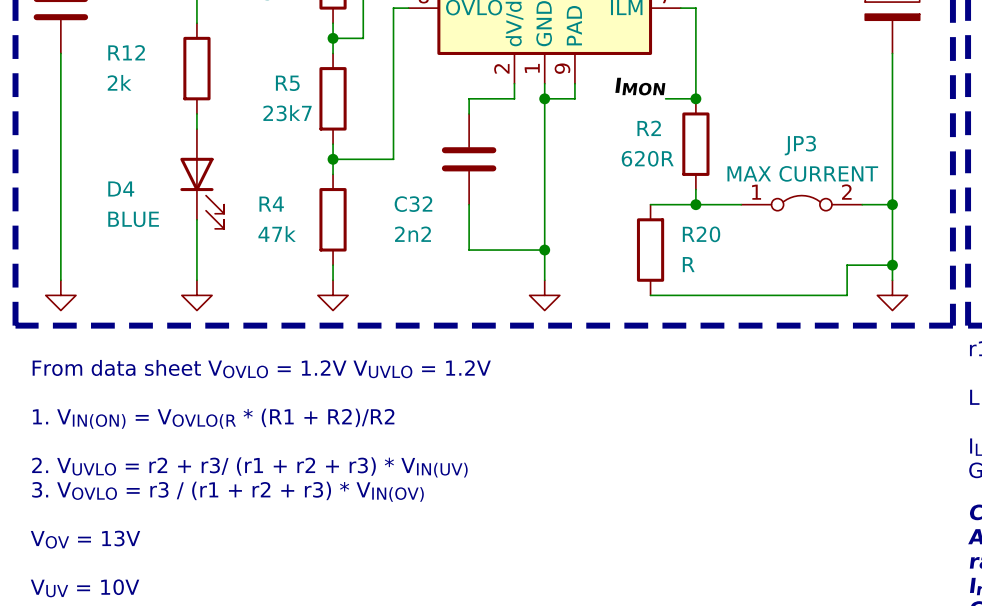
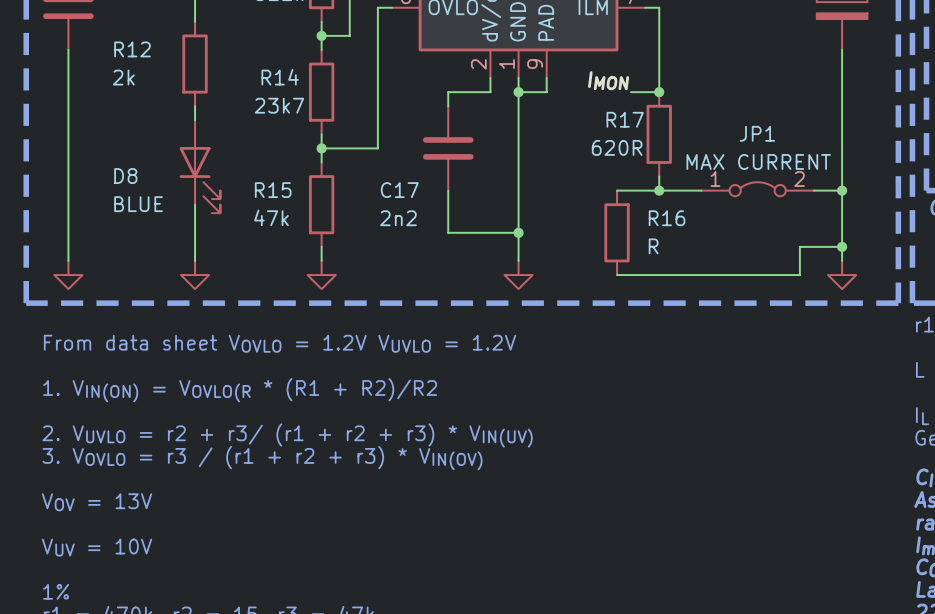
R5 name: R5 (287, 83) -> R14 (280, 77)
R2 name: R2 (649, 128) -> R17 (625, 119)
JP3 name: JP3 (800, 145) -> JP1 (757, 133)
D4 name: D4 (121, 188) -> D8 (125, 176)
R4 name: R4 (271, 204) -> R15 (273, 190)
C32 name: C32 (413, 204) -> C17 (399, 190)
R20 name: R20 (701, 234) -> R16 (667, 218)

